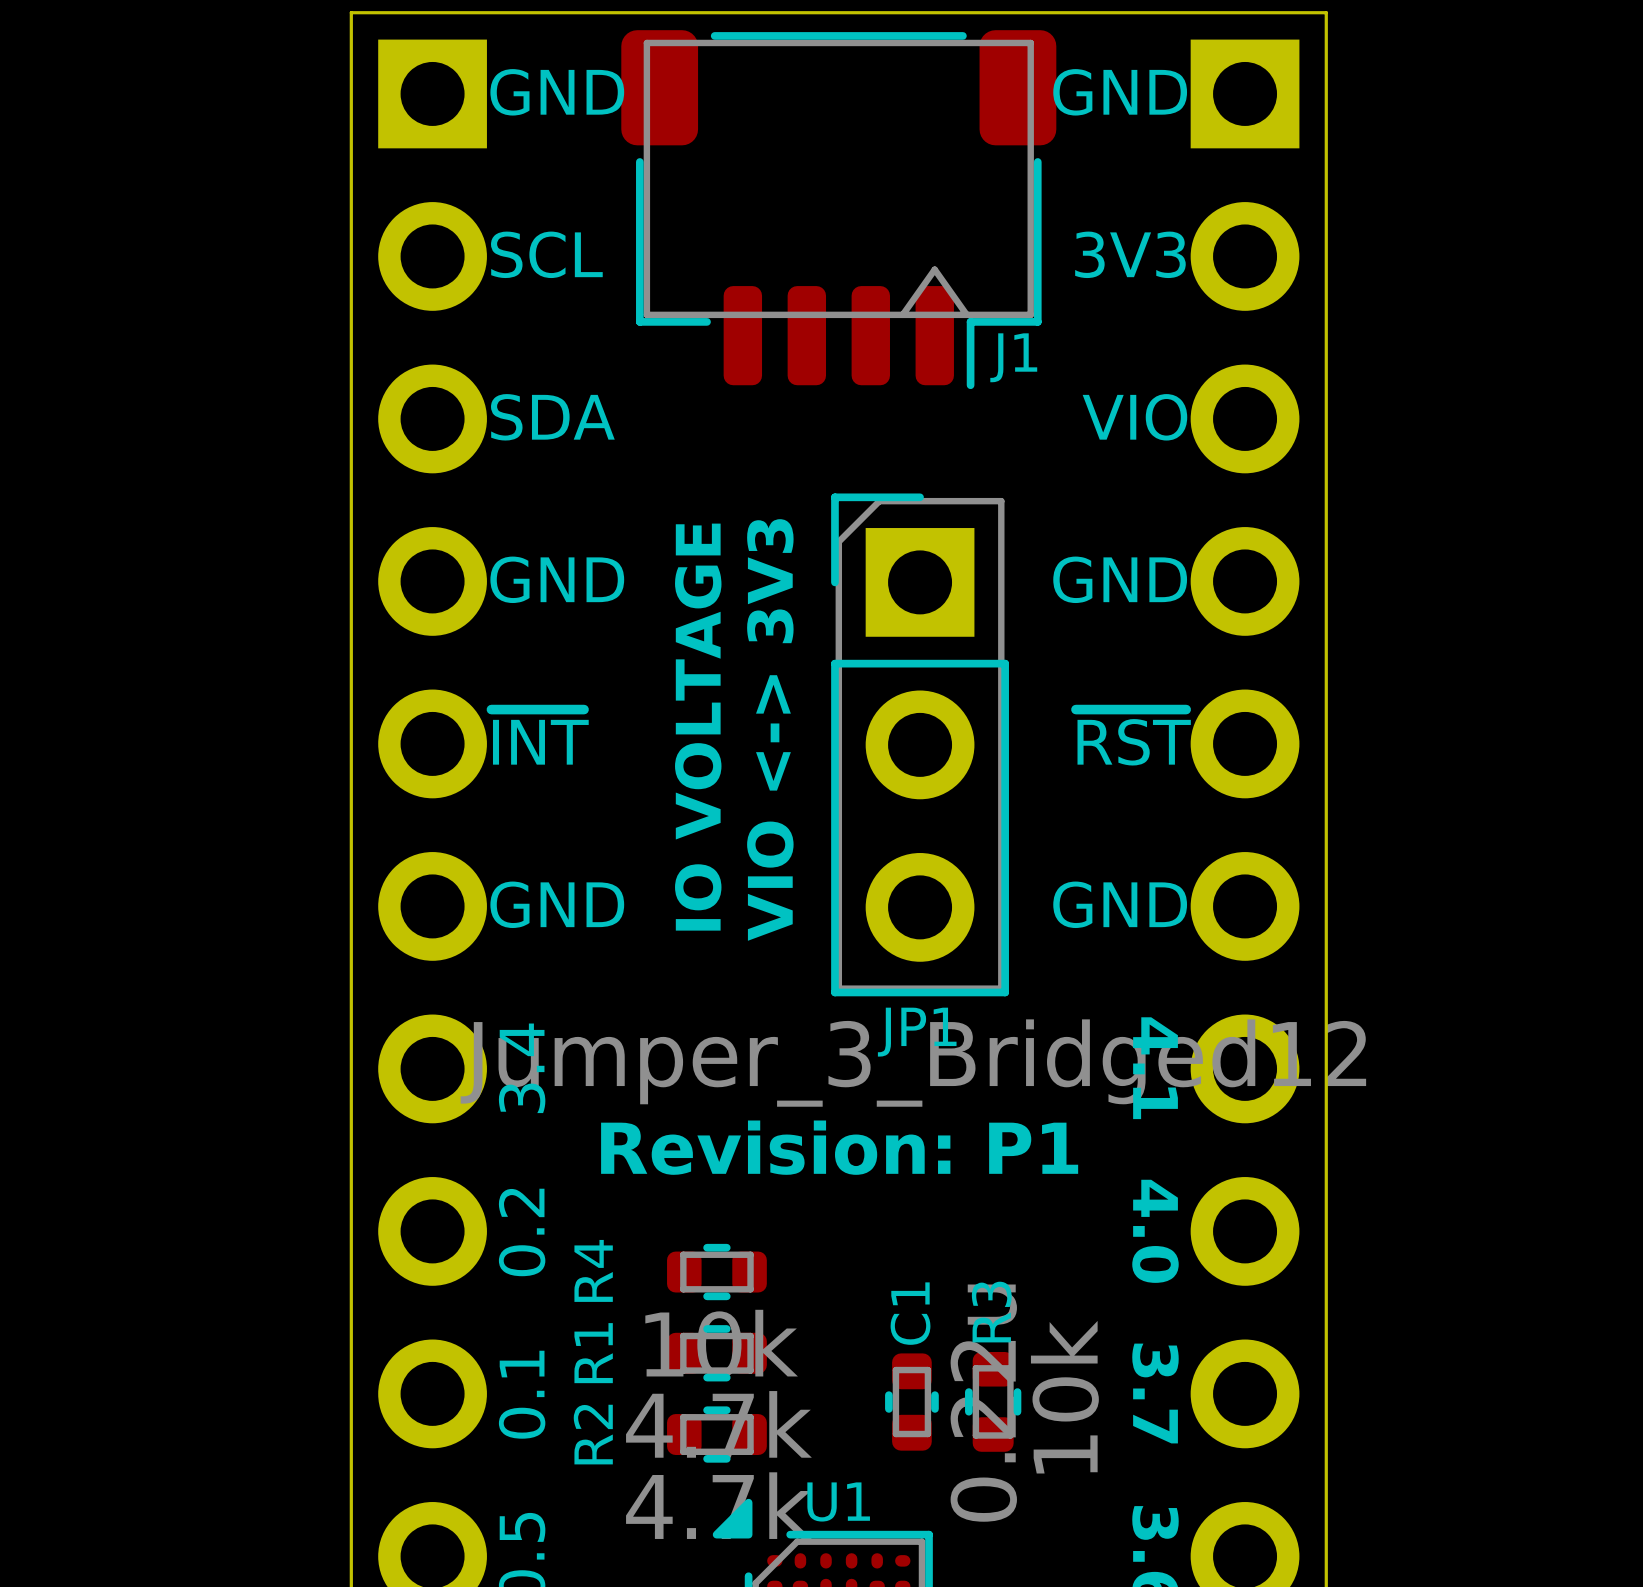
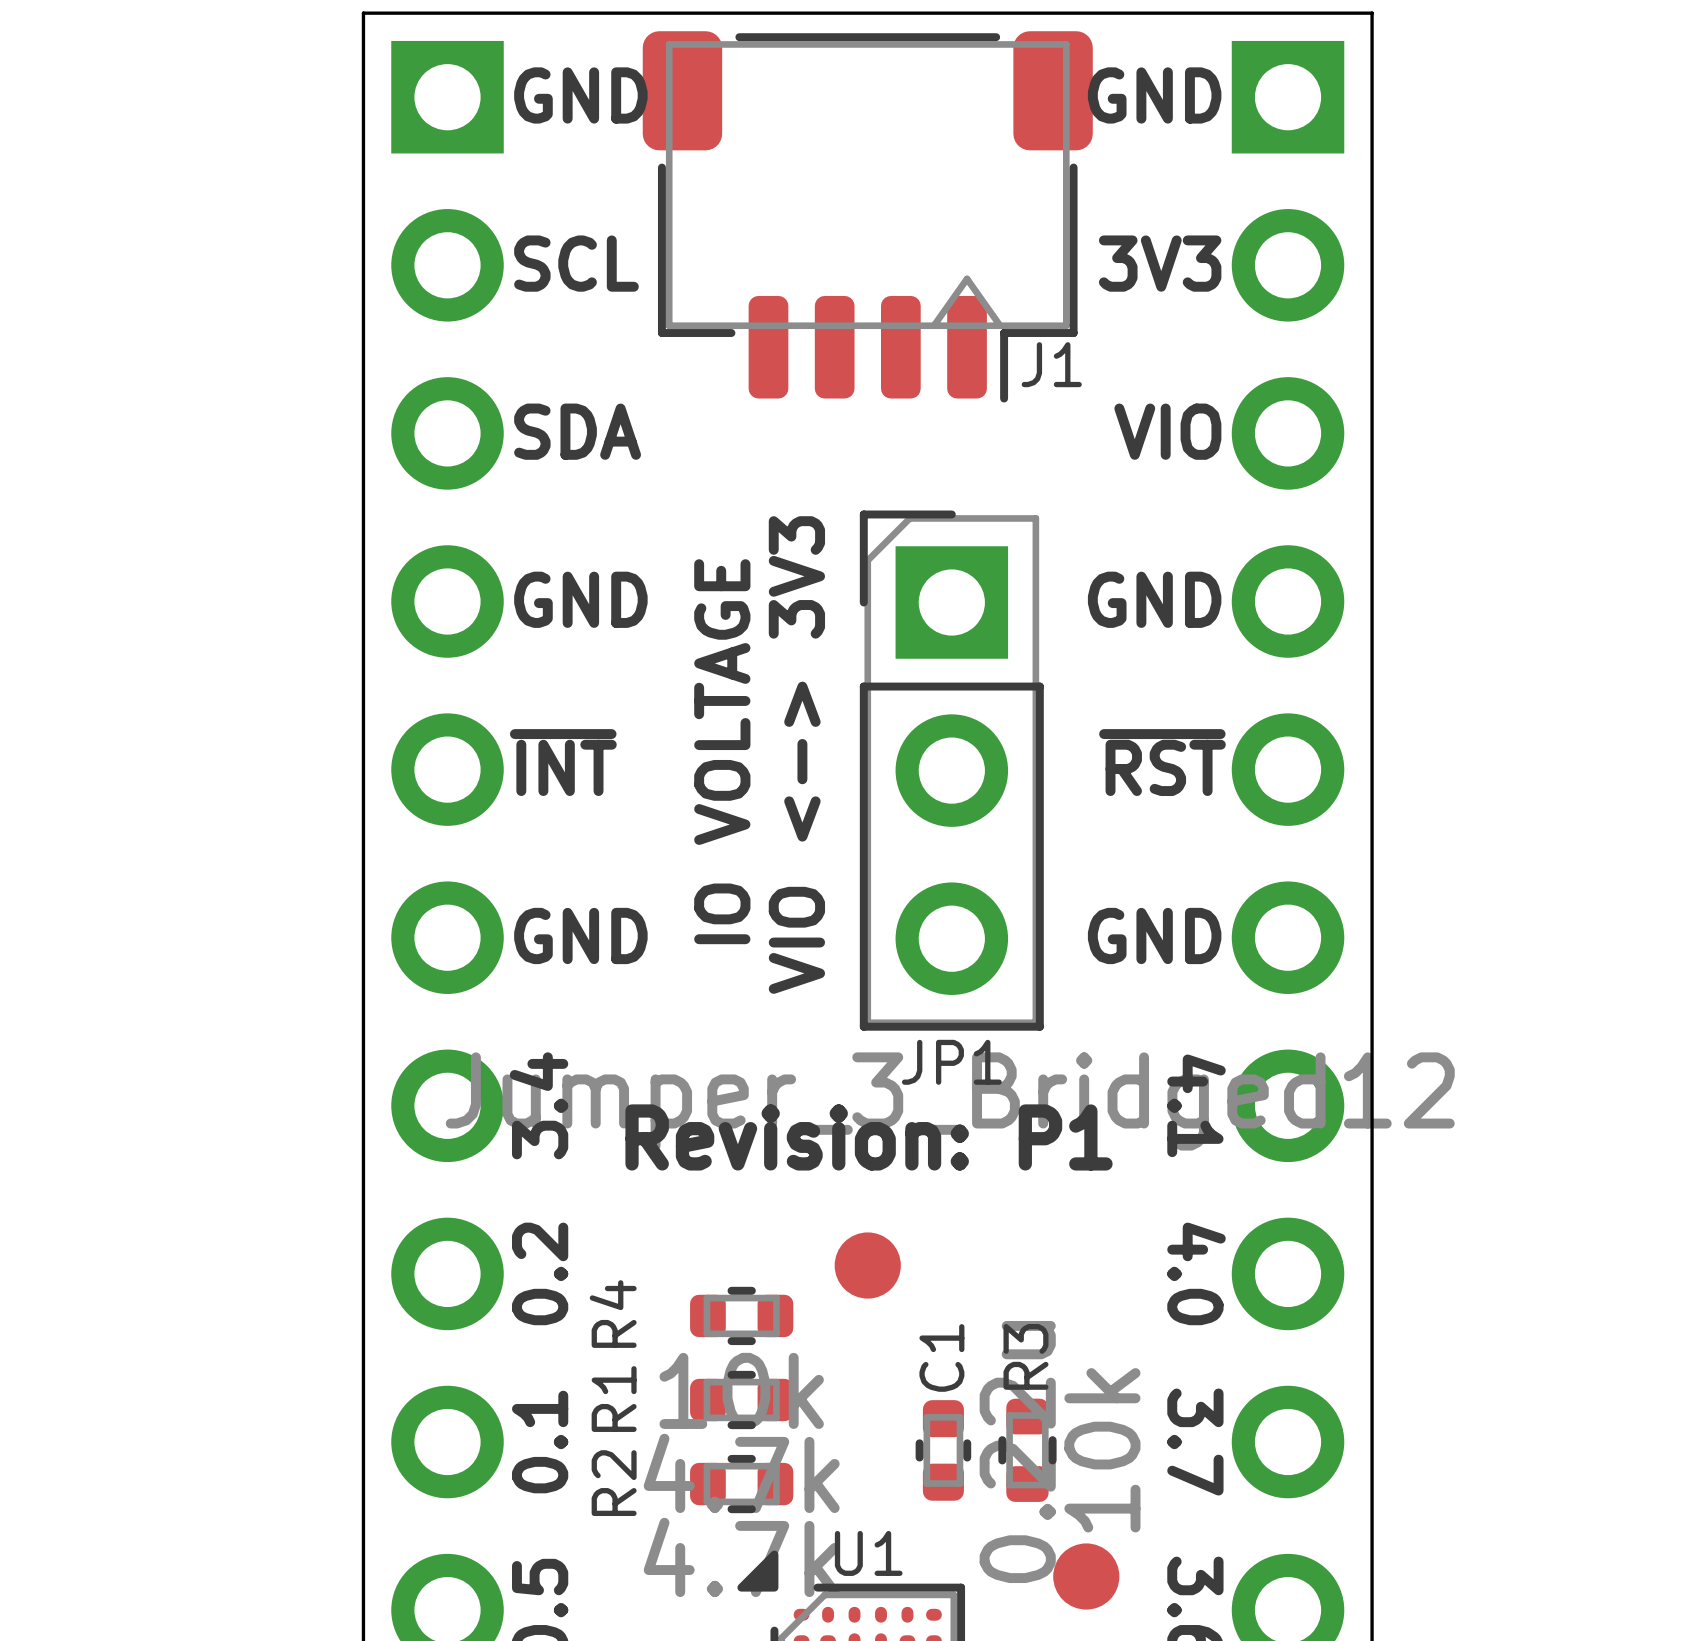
text position: Revision: P1 (839, 1147) -> Revision: P1 (869, 1137)
part: none -> (867, 1265)
part: none -> (1086, 1576)

